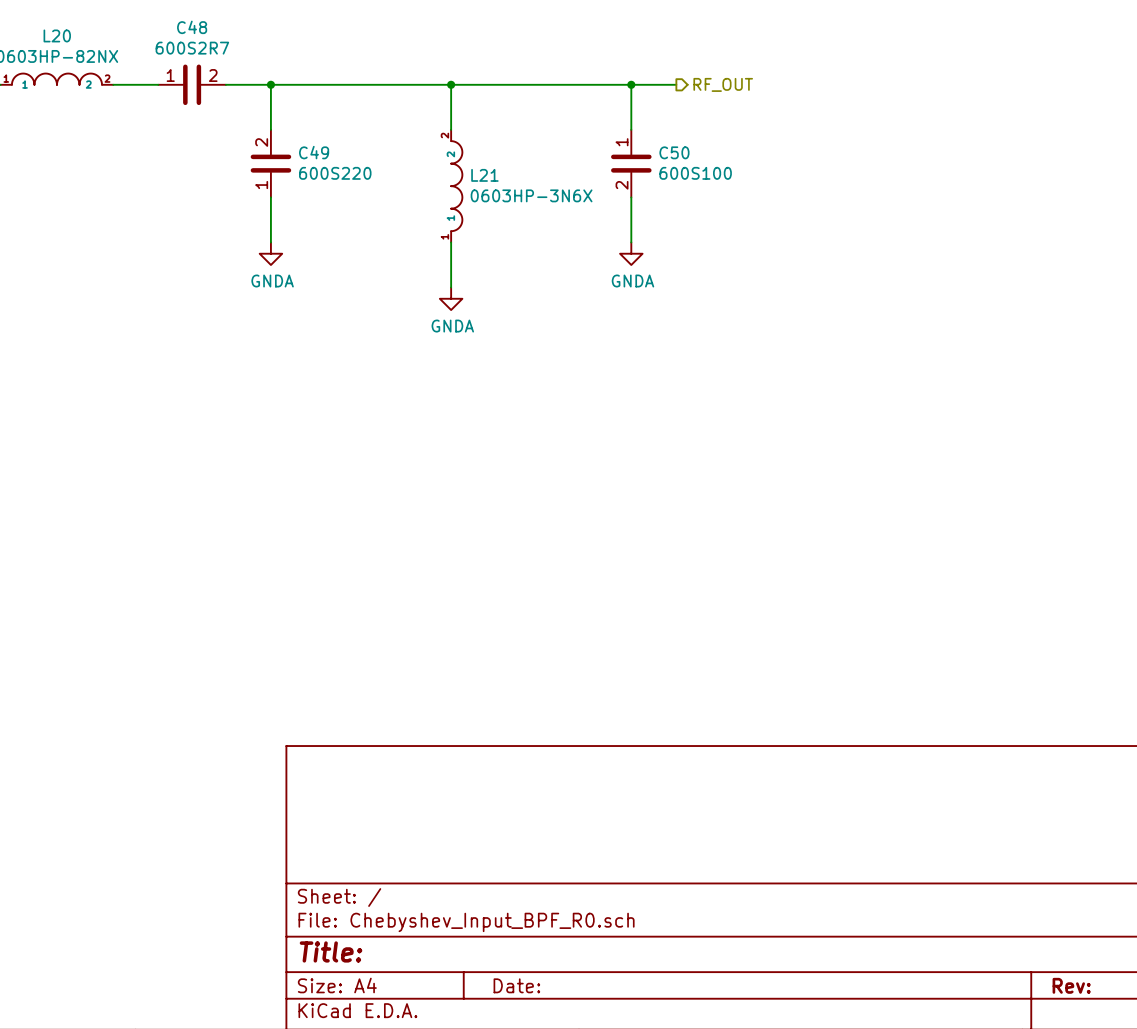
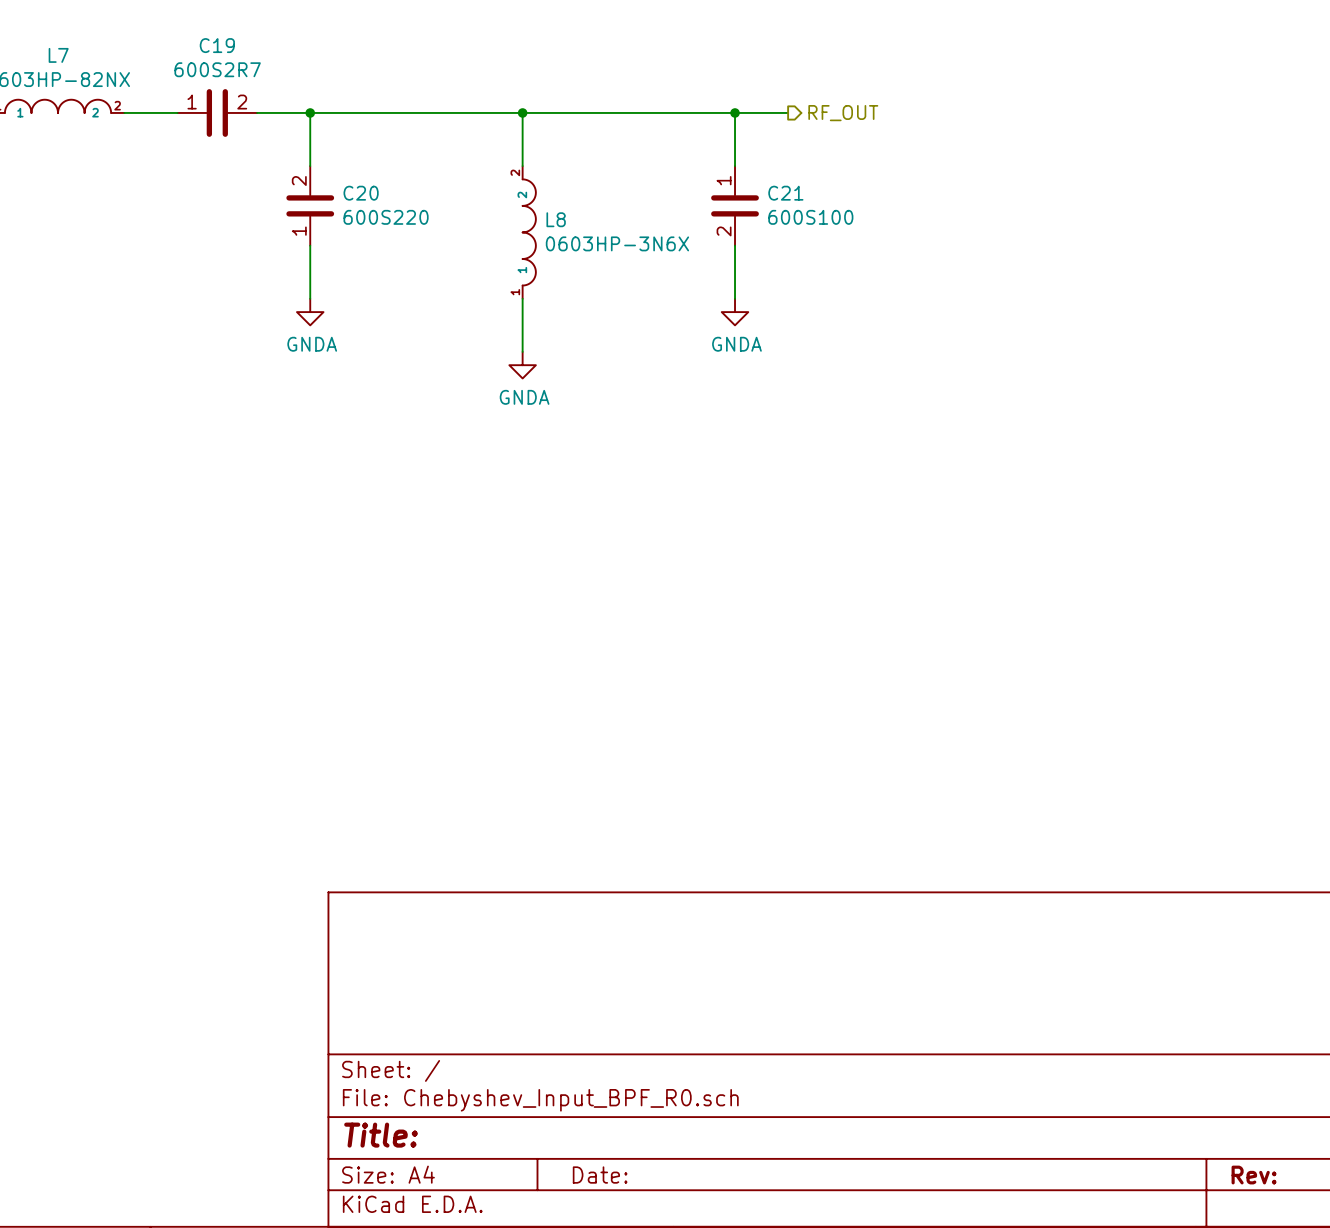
C48 name: C48 (192, 27) -> C19 (217, 45)
L20 name: L20 (57, 35) -> L7 (58, 55)
C49 name: C49 (314, 152) -> C20 (361, 193)
C50 name: C50 (674, 152) -> C21 (785, 193)
L21 name: L21 (484, 175) -> L8 (556, 219)

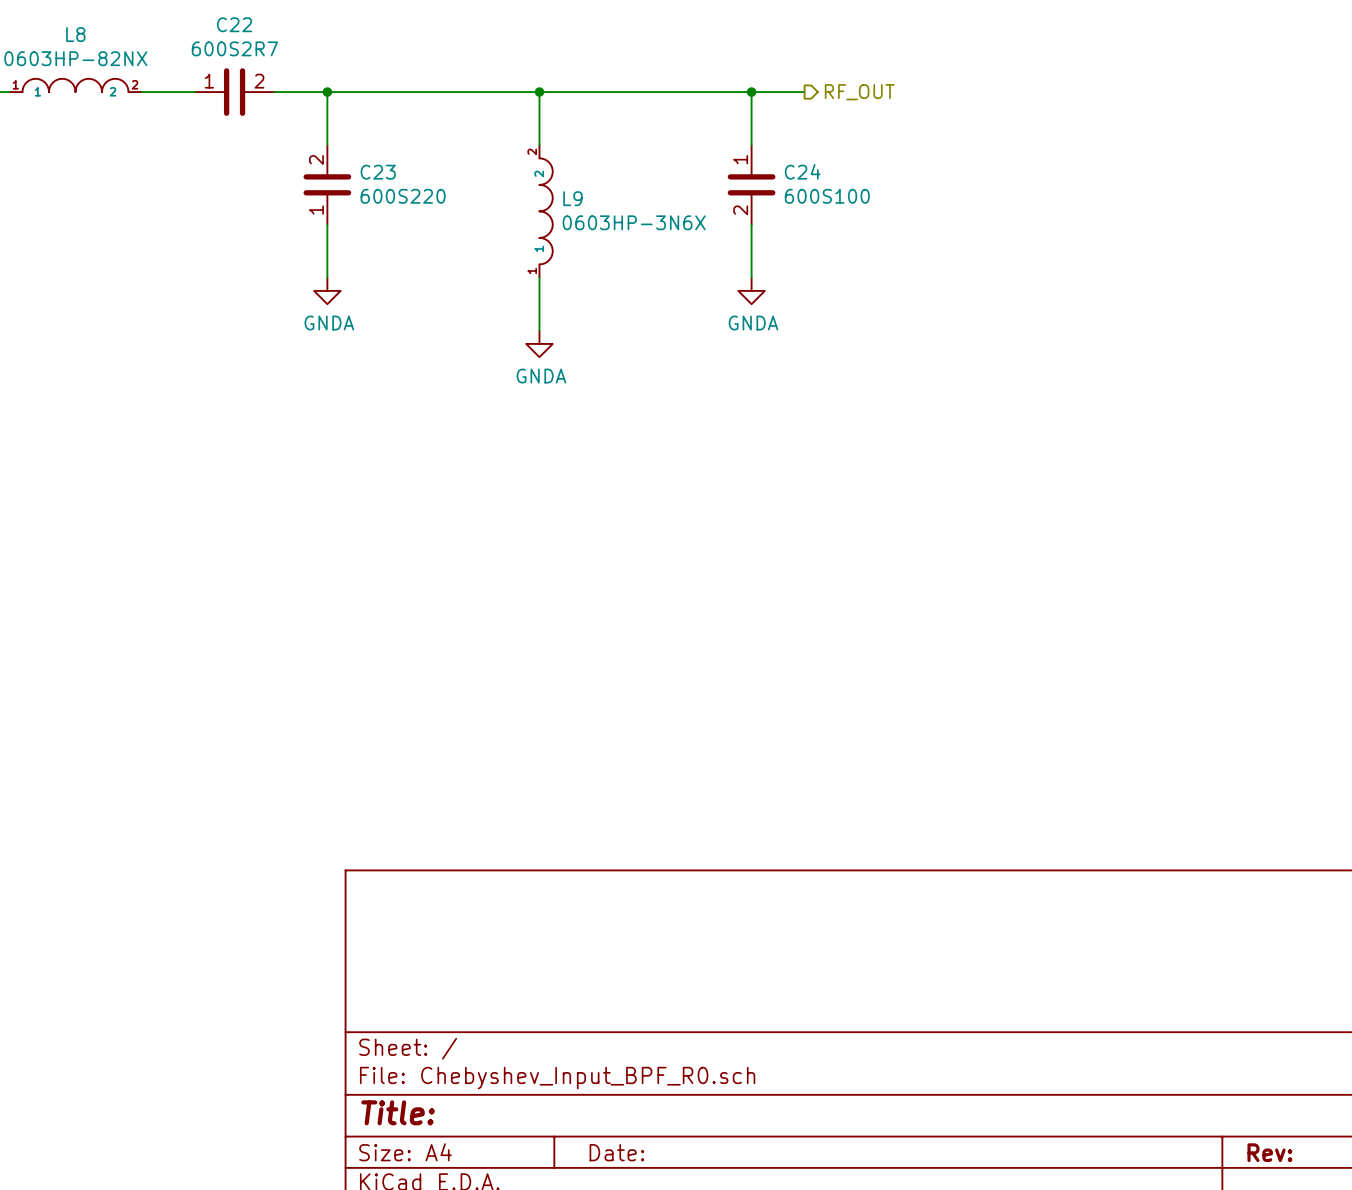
C19 name: C19 (217, 45) -> C22 (234, 24)
L7 name: L7 (58, 55) -> L8 (75, 34)
C20 name: C20 (361, 193) -> C23 (378, 172)
C21 name: C21 (785, 193) -> C24 (802, 171)
L8 name: L8 (556, 219) -> L9 (572, 198)

